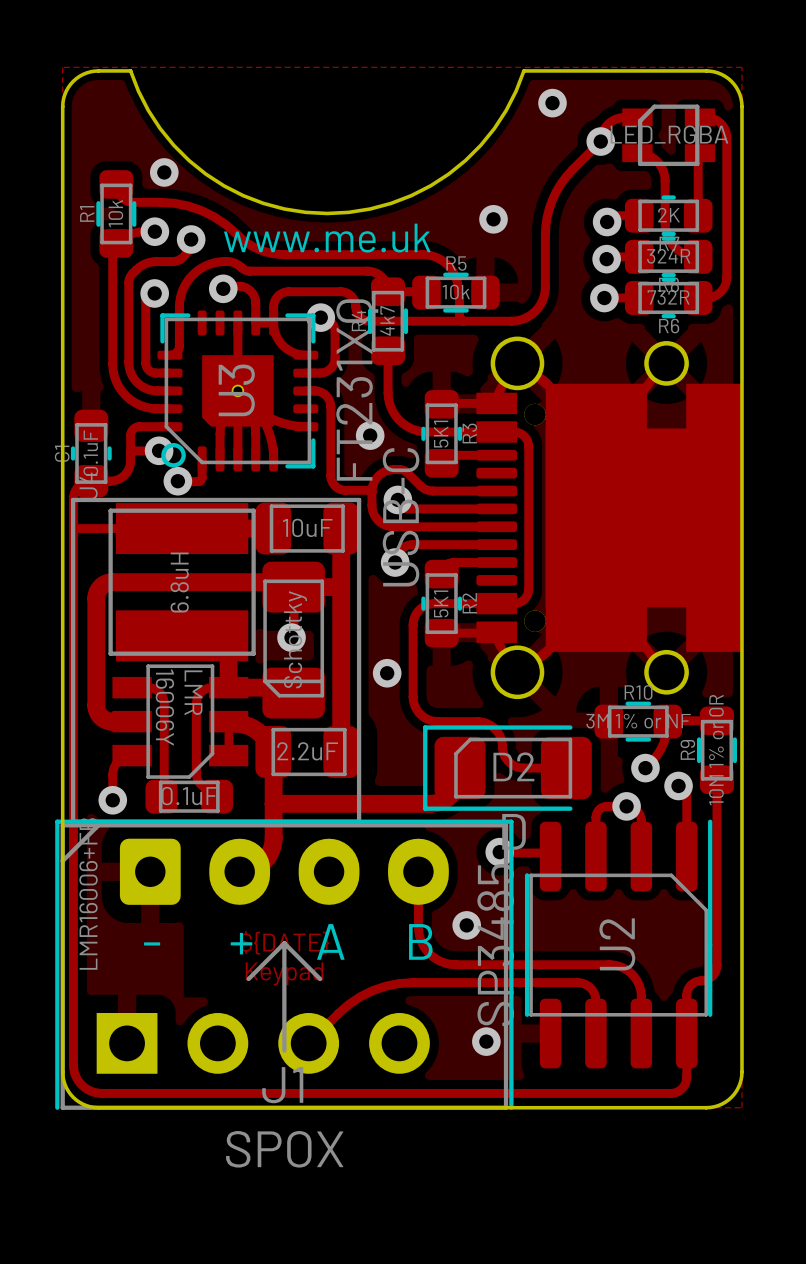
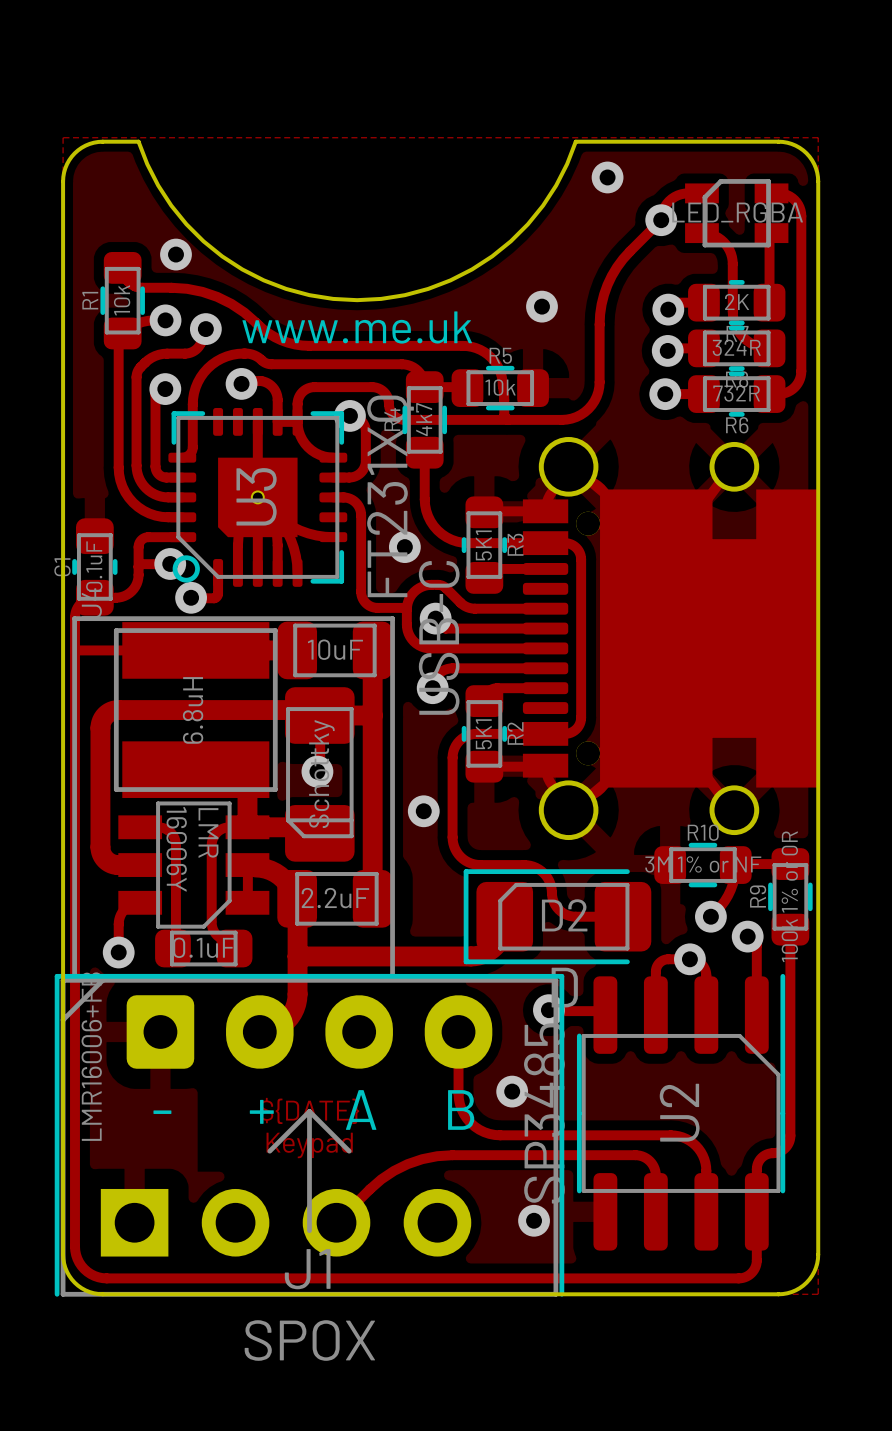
R9 value: 10M 1% or 0R (716, 750) -> 100k 1% or 0R (789, 896)

